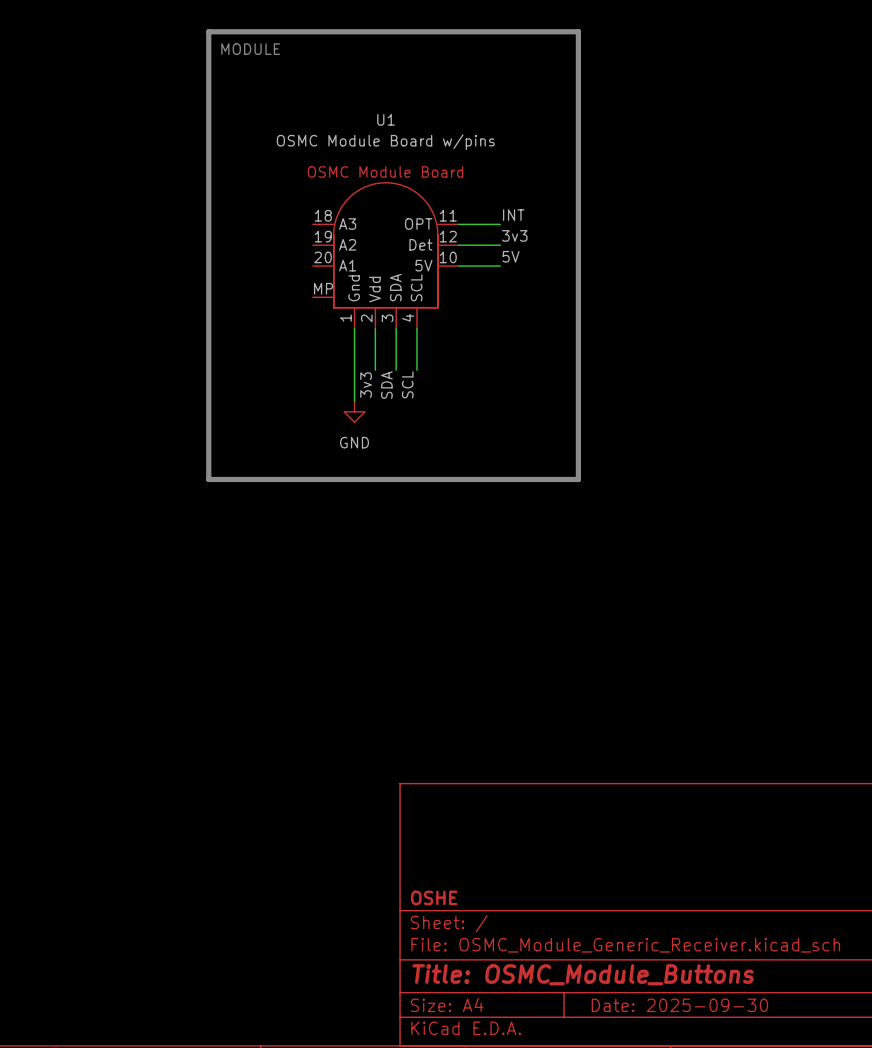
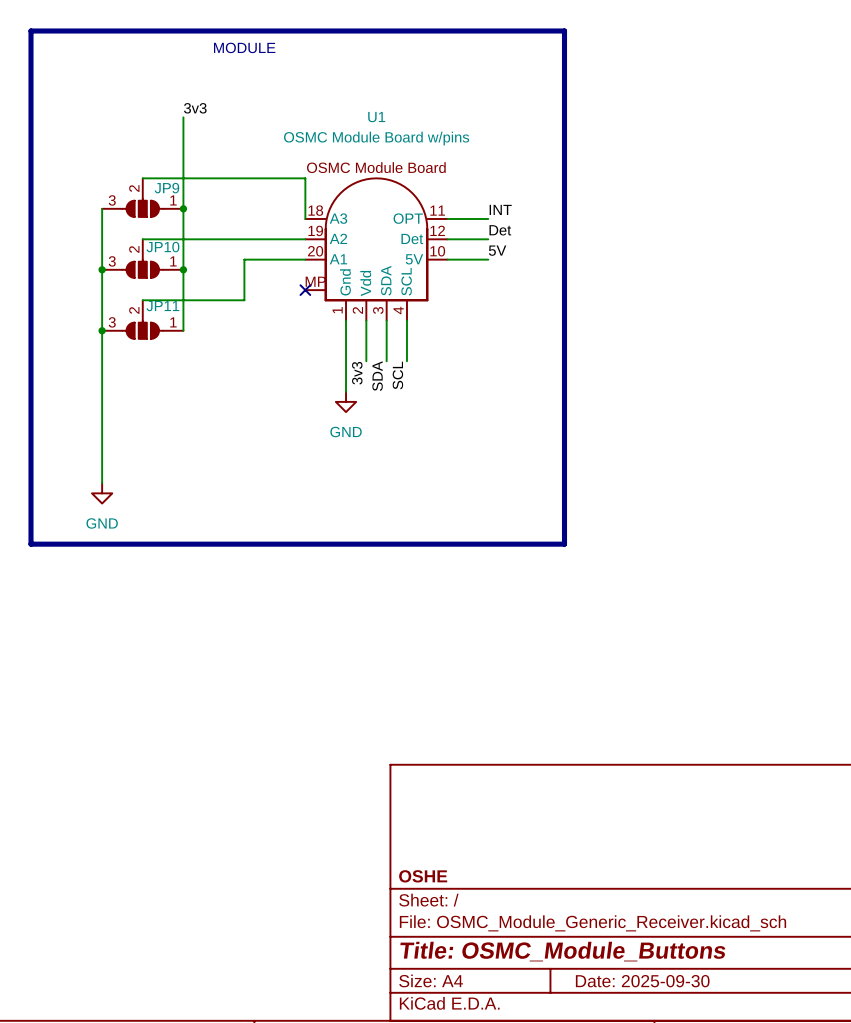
line: (208, 31) (208, 479) (578, 479) -> (203, 31) (31, 31) (31, 544) (564, 544) (564, 467)
label: none -> 3v3 (195, 108)
wire: none -> (183, 117) (183, 330)
wire: none -> (142, 178) (305, 178) (305, 218)
JP9: none -> (142, 197)
wire: none -> (102, 208) (102, 483)
junction: none -> (183, 208)
label: 3v3 (514, 235) -> Det (500, 230)
wire: none -> (142, 239) (305, 239)
JP10: none -> (142, 258)
wire: none -> (305, 259) (244, 259) (244, 300) (142, 300)
junction: none -> (102, 269)
junction: none -> (183, 269)
no-connect mark: none -> (305, 290)
JP11: none -> (142, 319)
junction: none -> (102, 330)
power symbol: none -> GND (102, 493)

